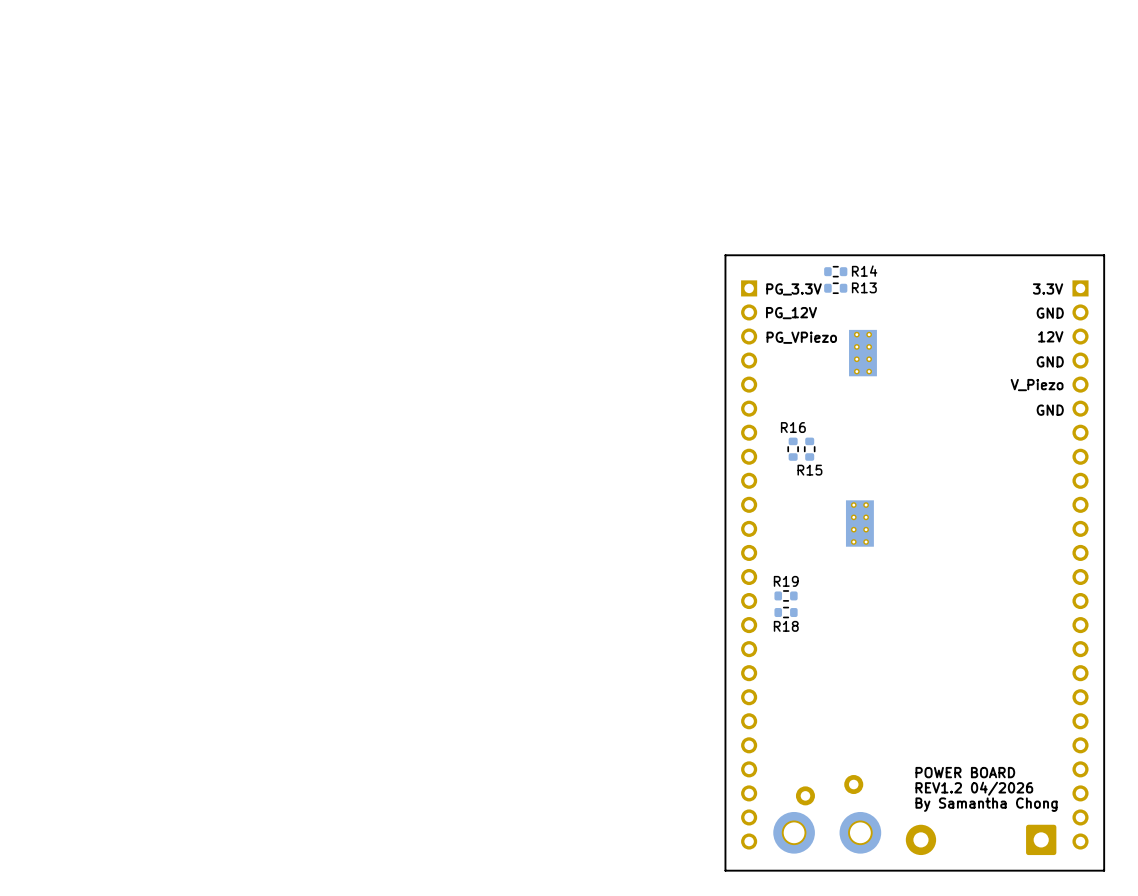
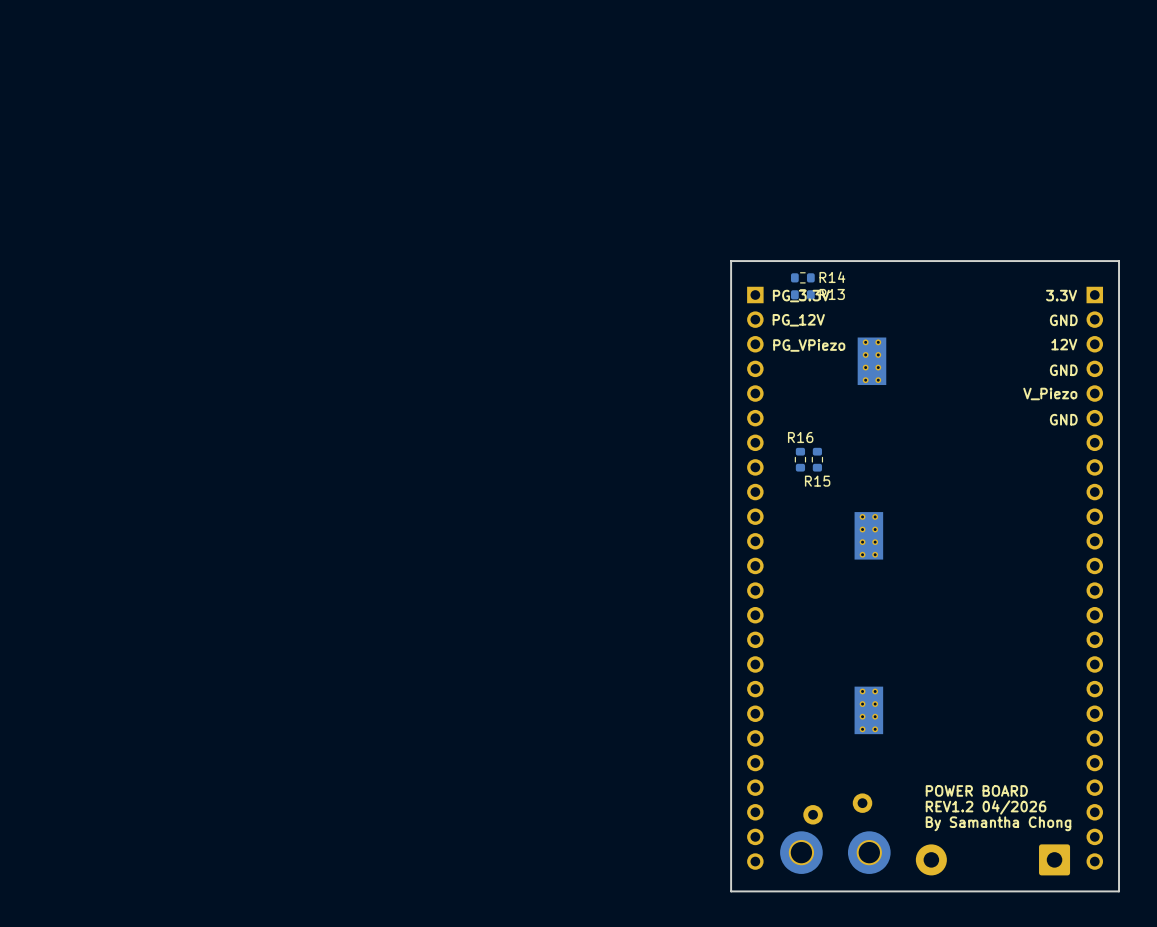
R14 position: (835, 271) -> (802, 277)
R13 position: (835, 288) -> (802, 294)
R19: (786, 595) -> none
R18: (786, 612) -> none
part: none -> (868, 710)

